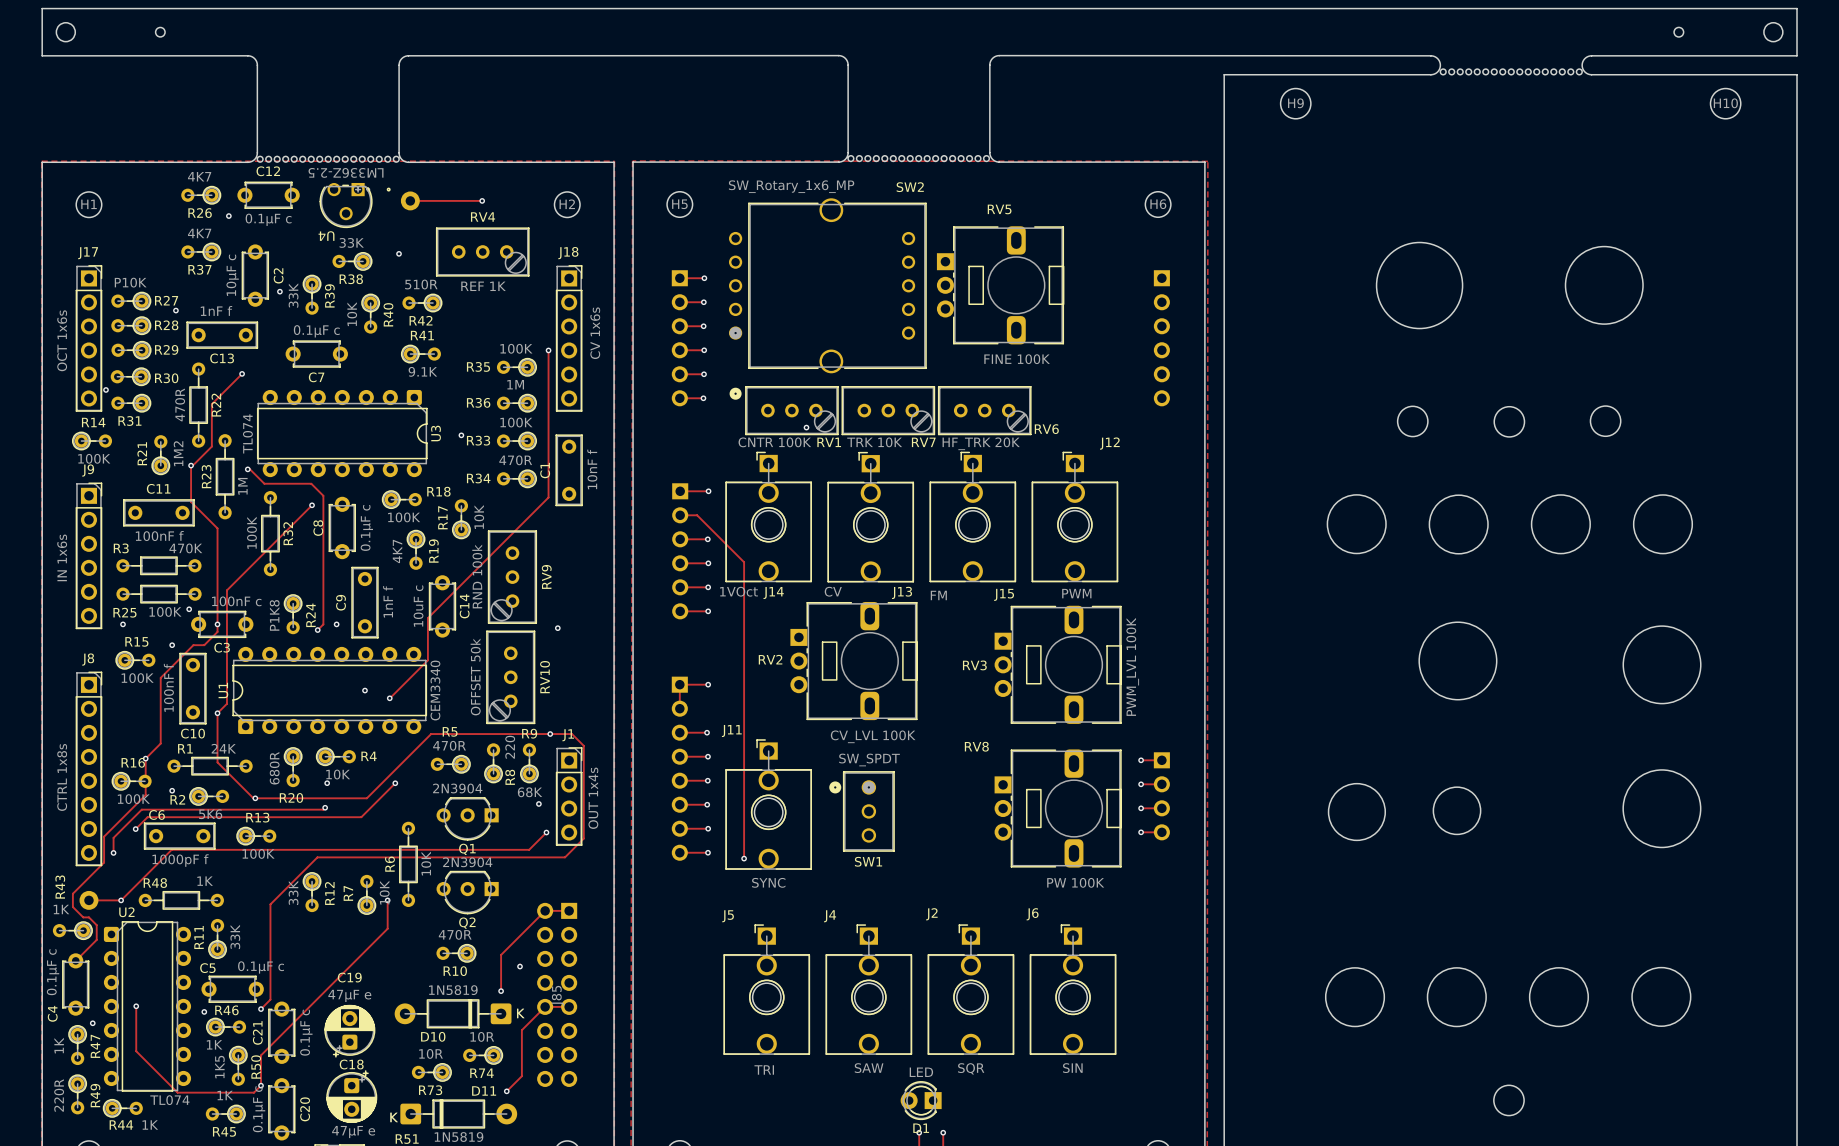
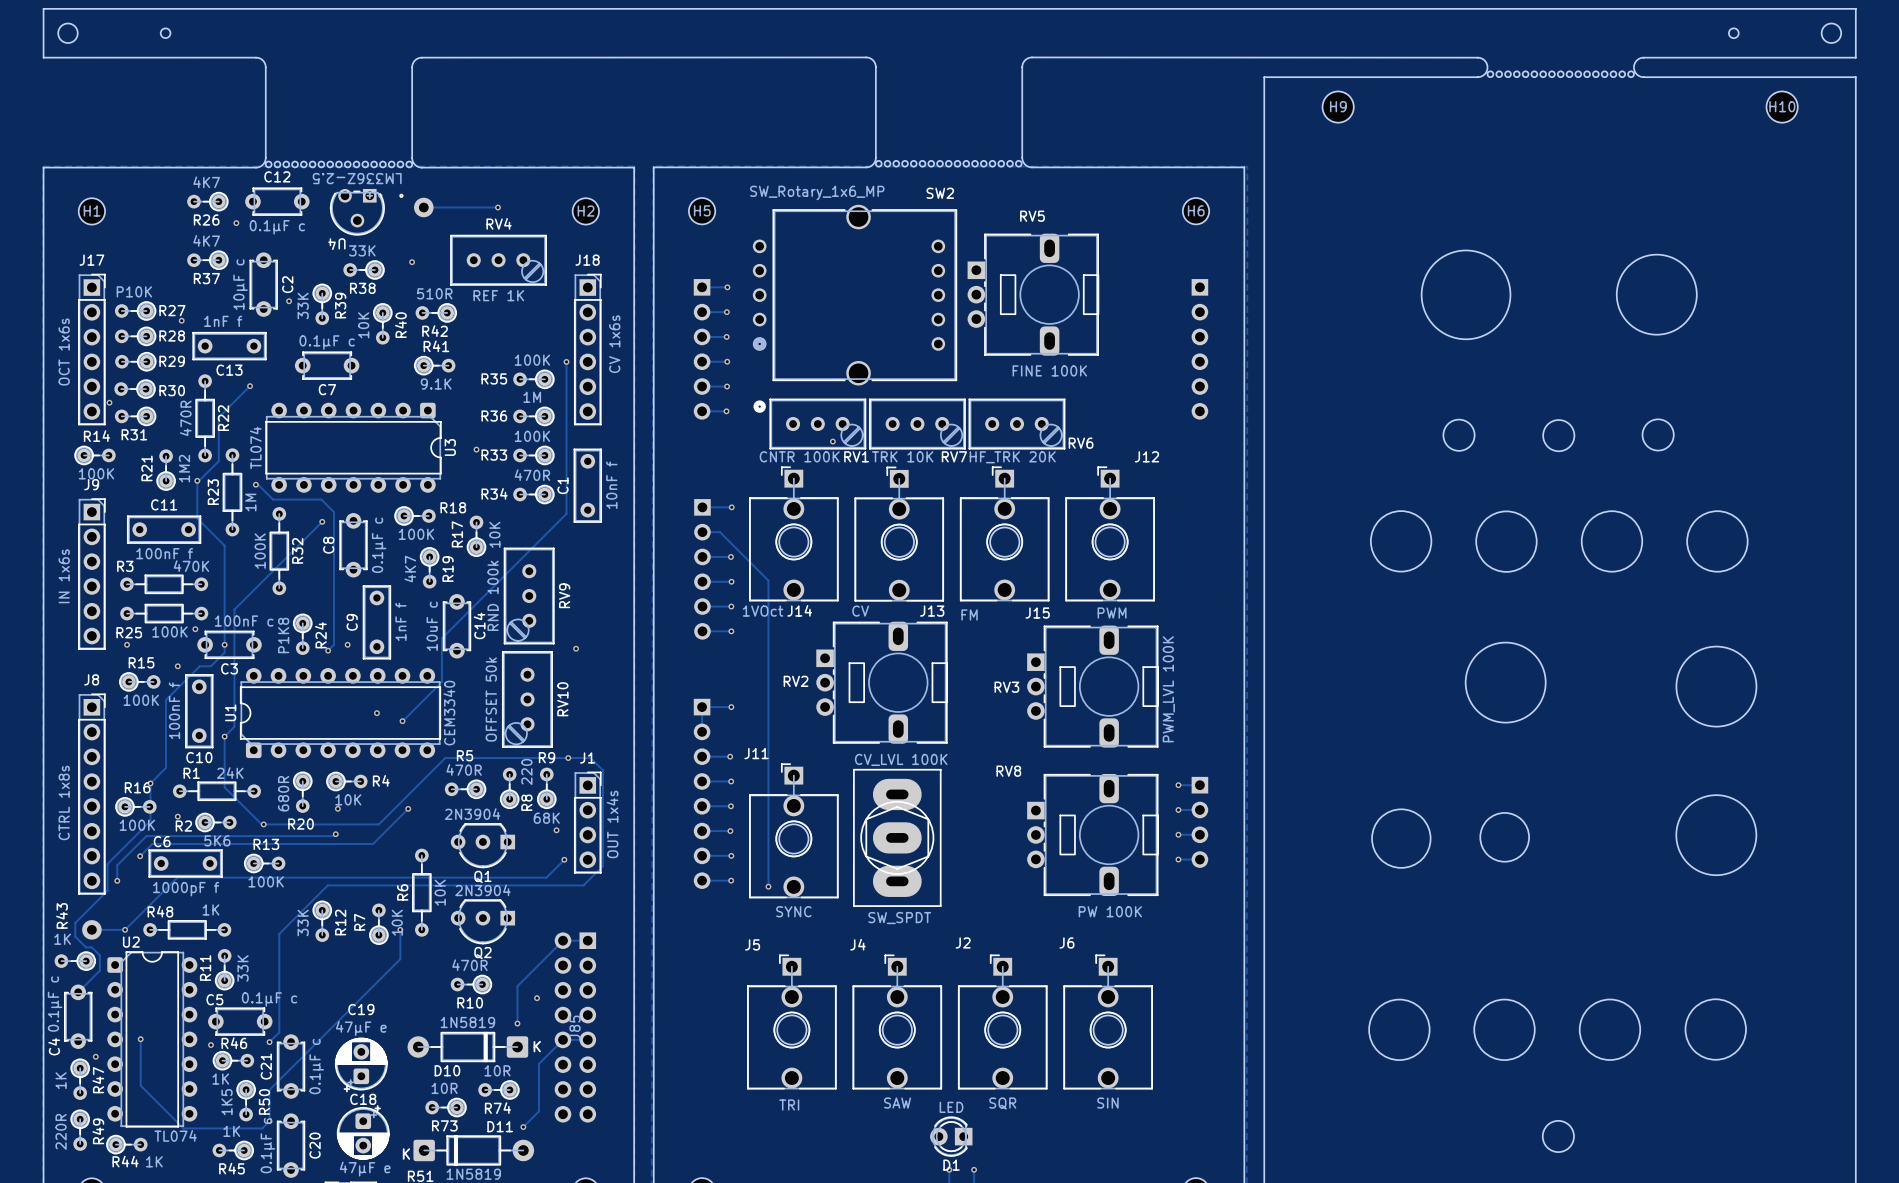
SW1: SW_SPDT (862, 811) -> none
part: none -> SW_SPDT (897, 837)

